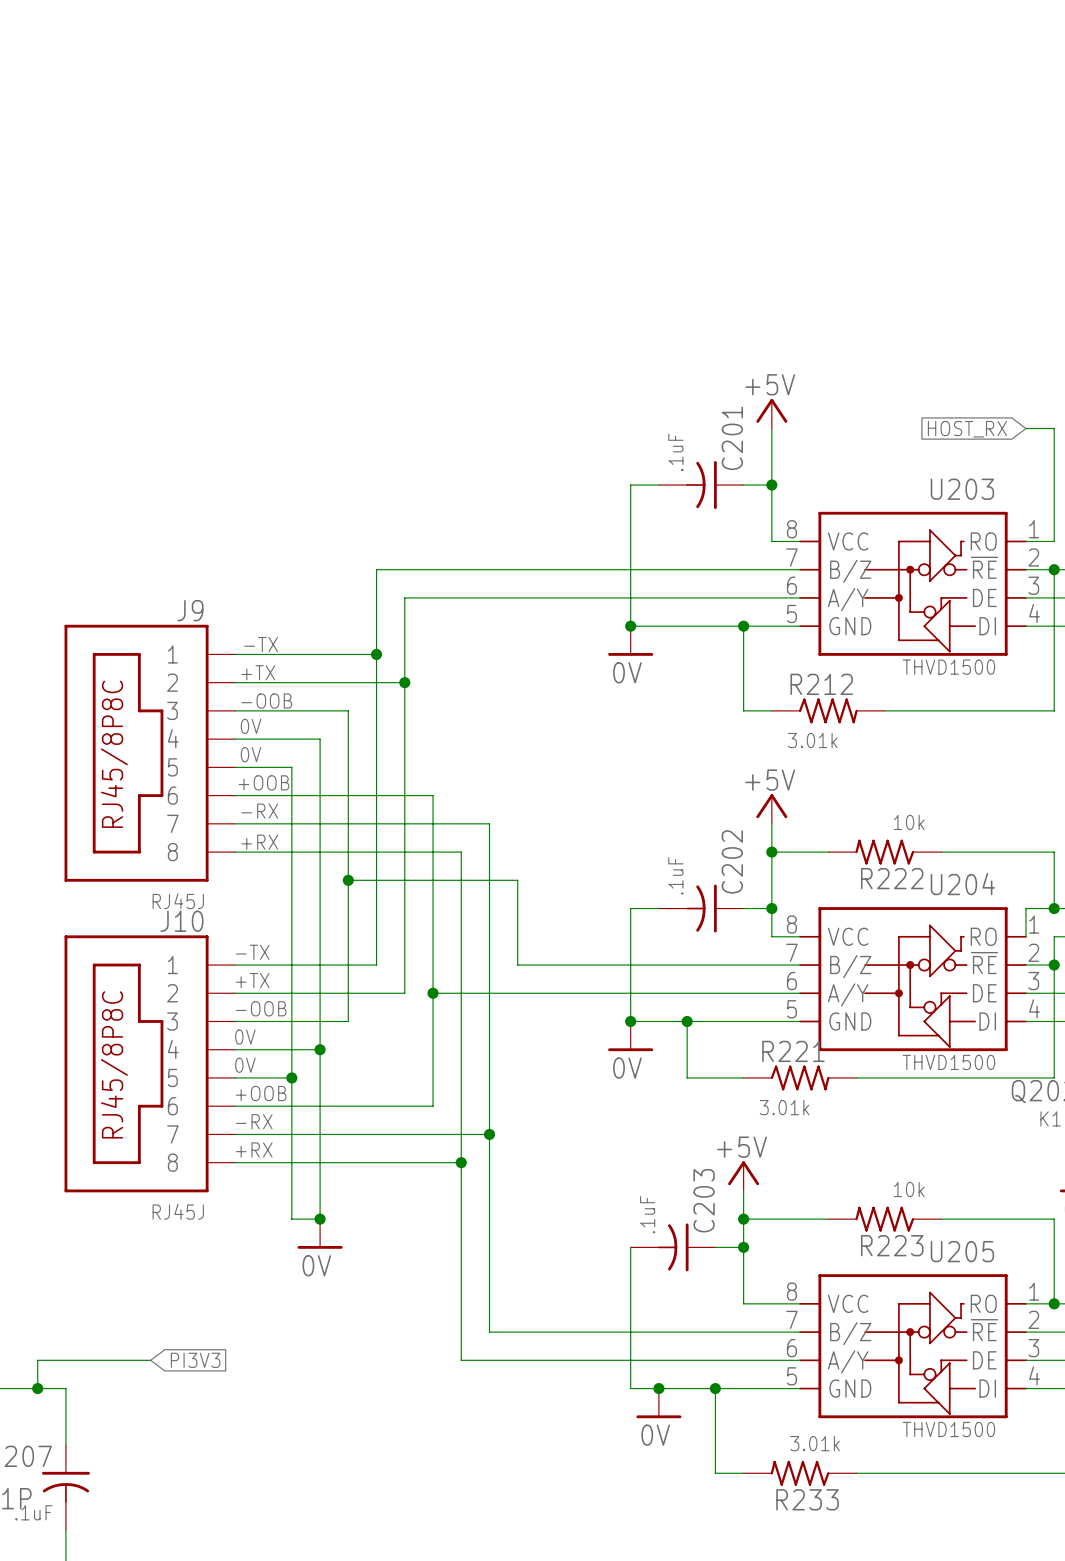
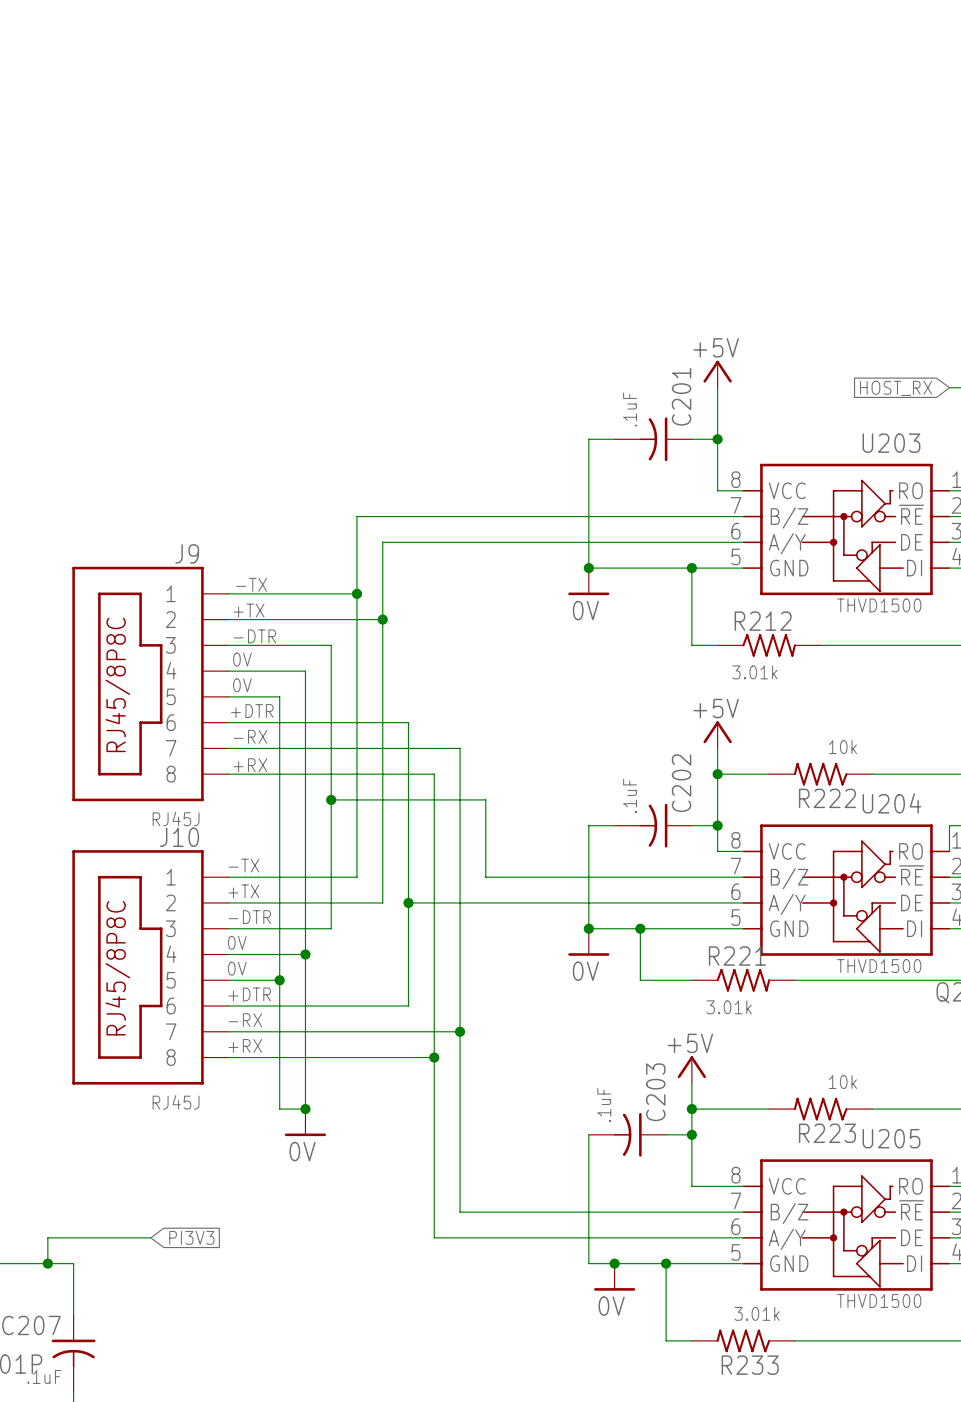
label: -OOB (266, 701) -> -DTR (254, 636)
label: +OOB (263, 782) -> +DTR (252, 711)
label: -OOB (261, 1008) -> -DTR (249, 917)
label: +OOB (261, 1093) -> +DTR (249, 994)

